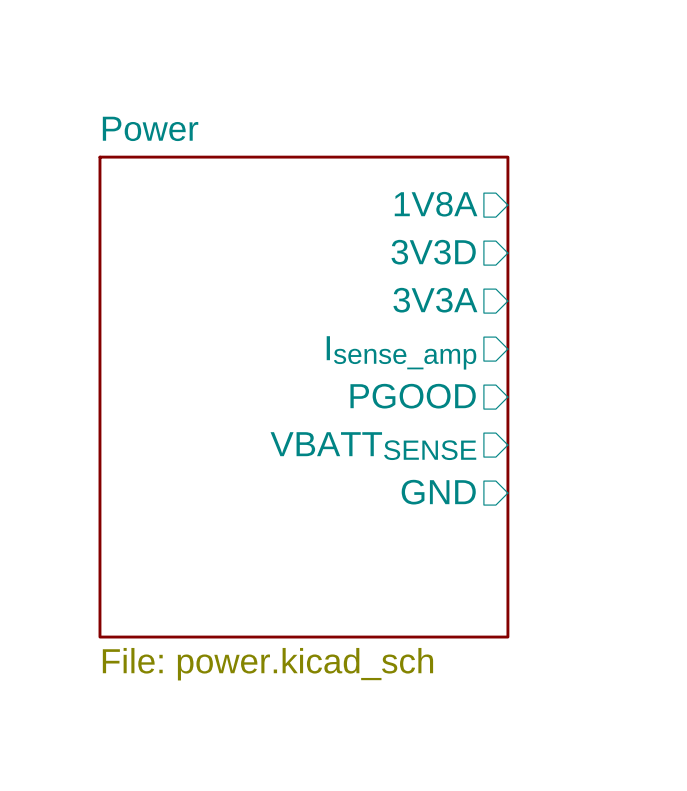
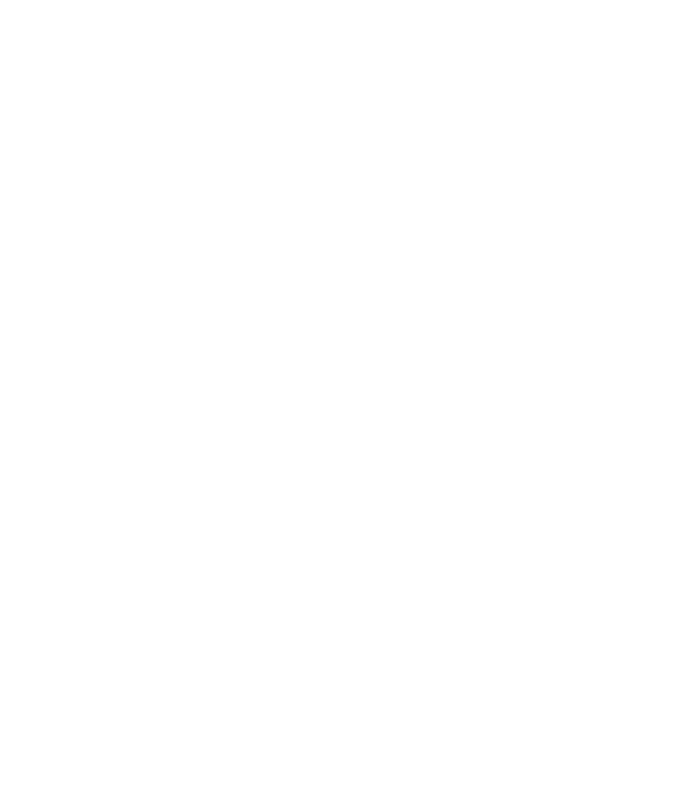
sheet pin: 1V8A (436, 204) -> none
sheet pin: 3V3D (433, 252) -> none
sheet pin: 3V3A (435, 300) -> none
sheet pin: Isense_amp (401, 352) -> none
sheet pin: PGOOD (413, 396) -> none
sheet Power: File: power.kicad_sch (303, 397) -> none
sheet pin: VBATTSENSE (373, 446) -> none
sheet pin: GND (438, 492) -> none

